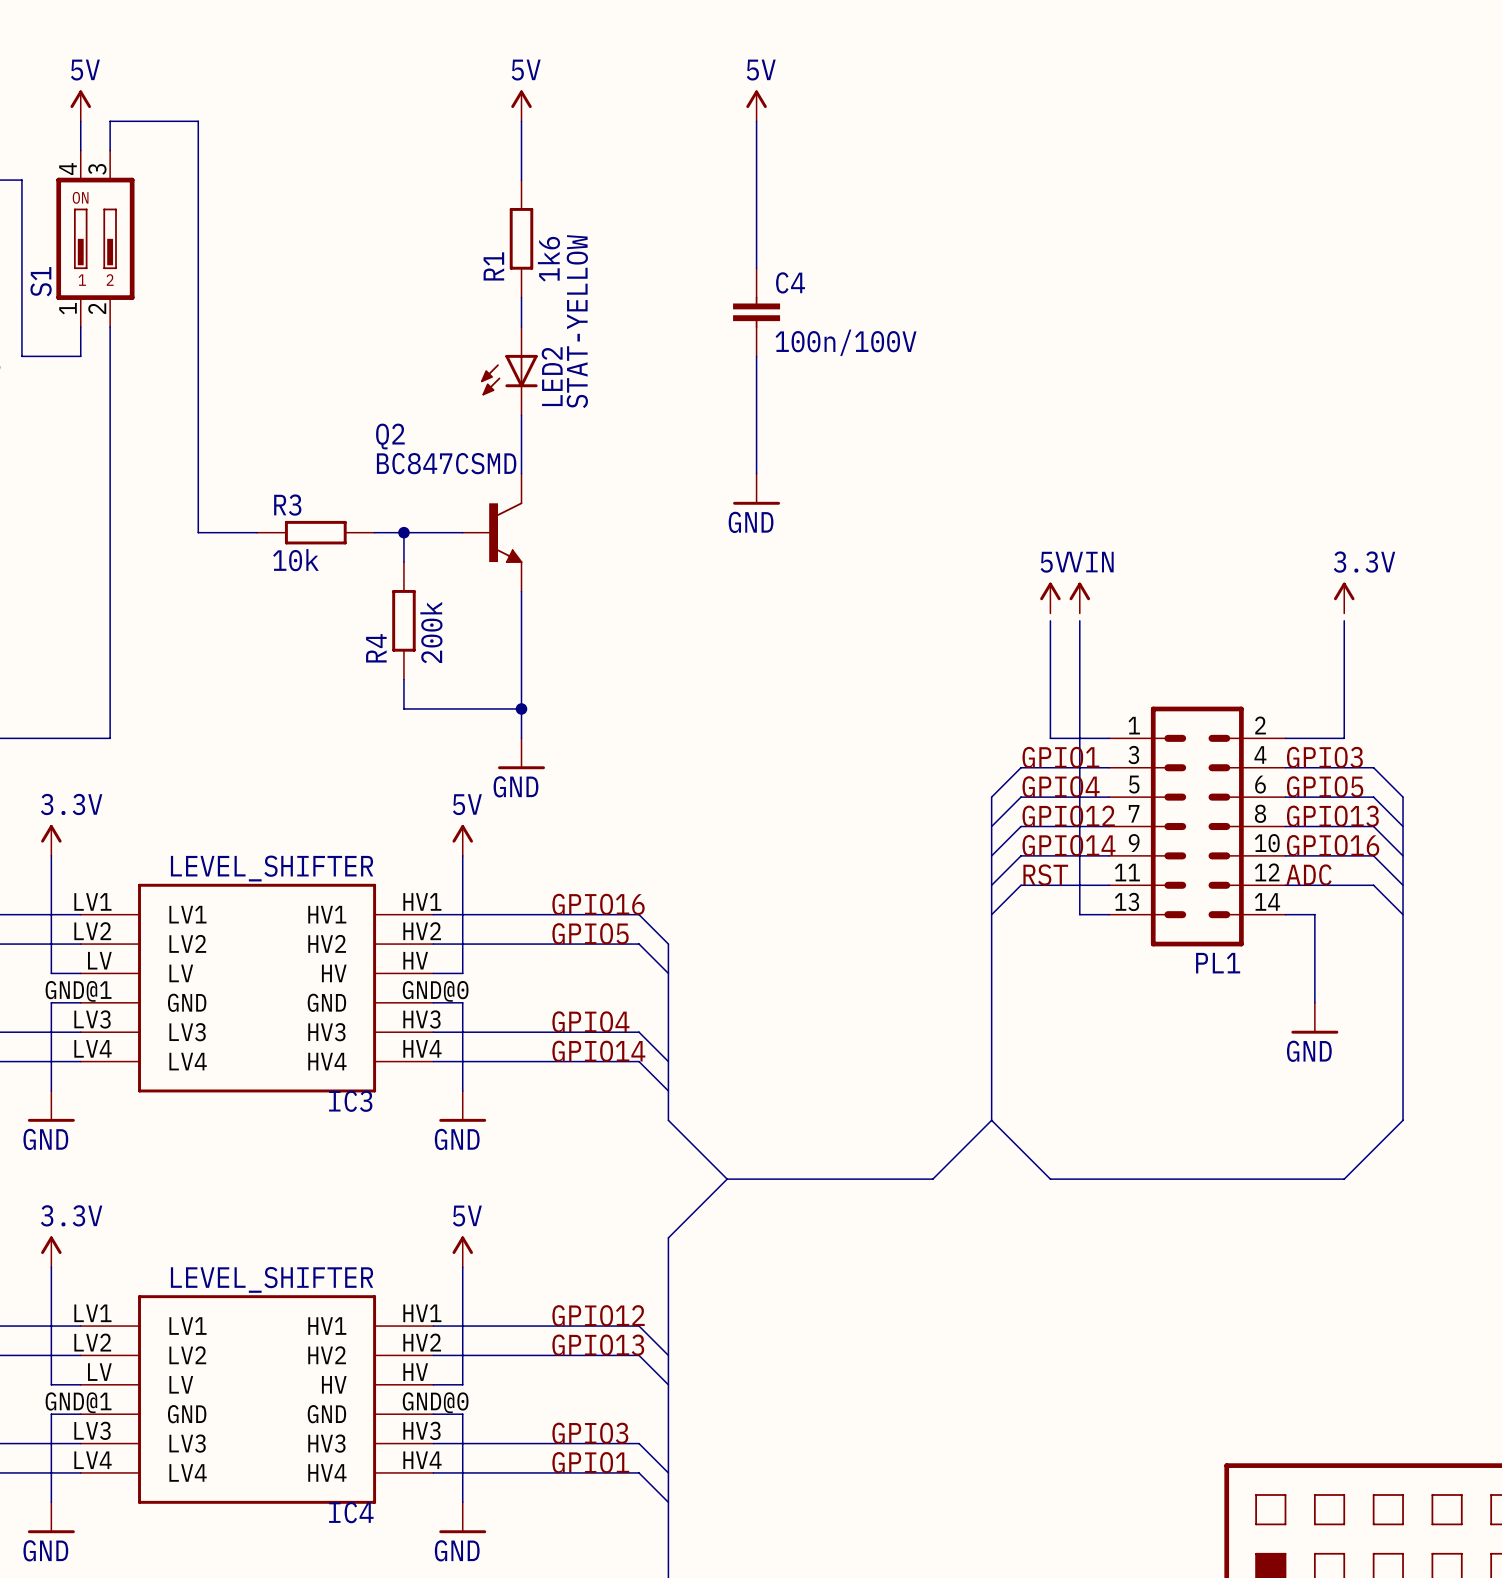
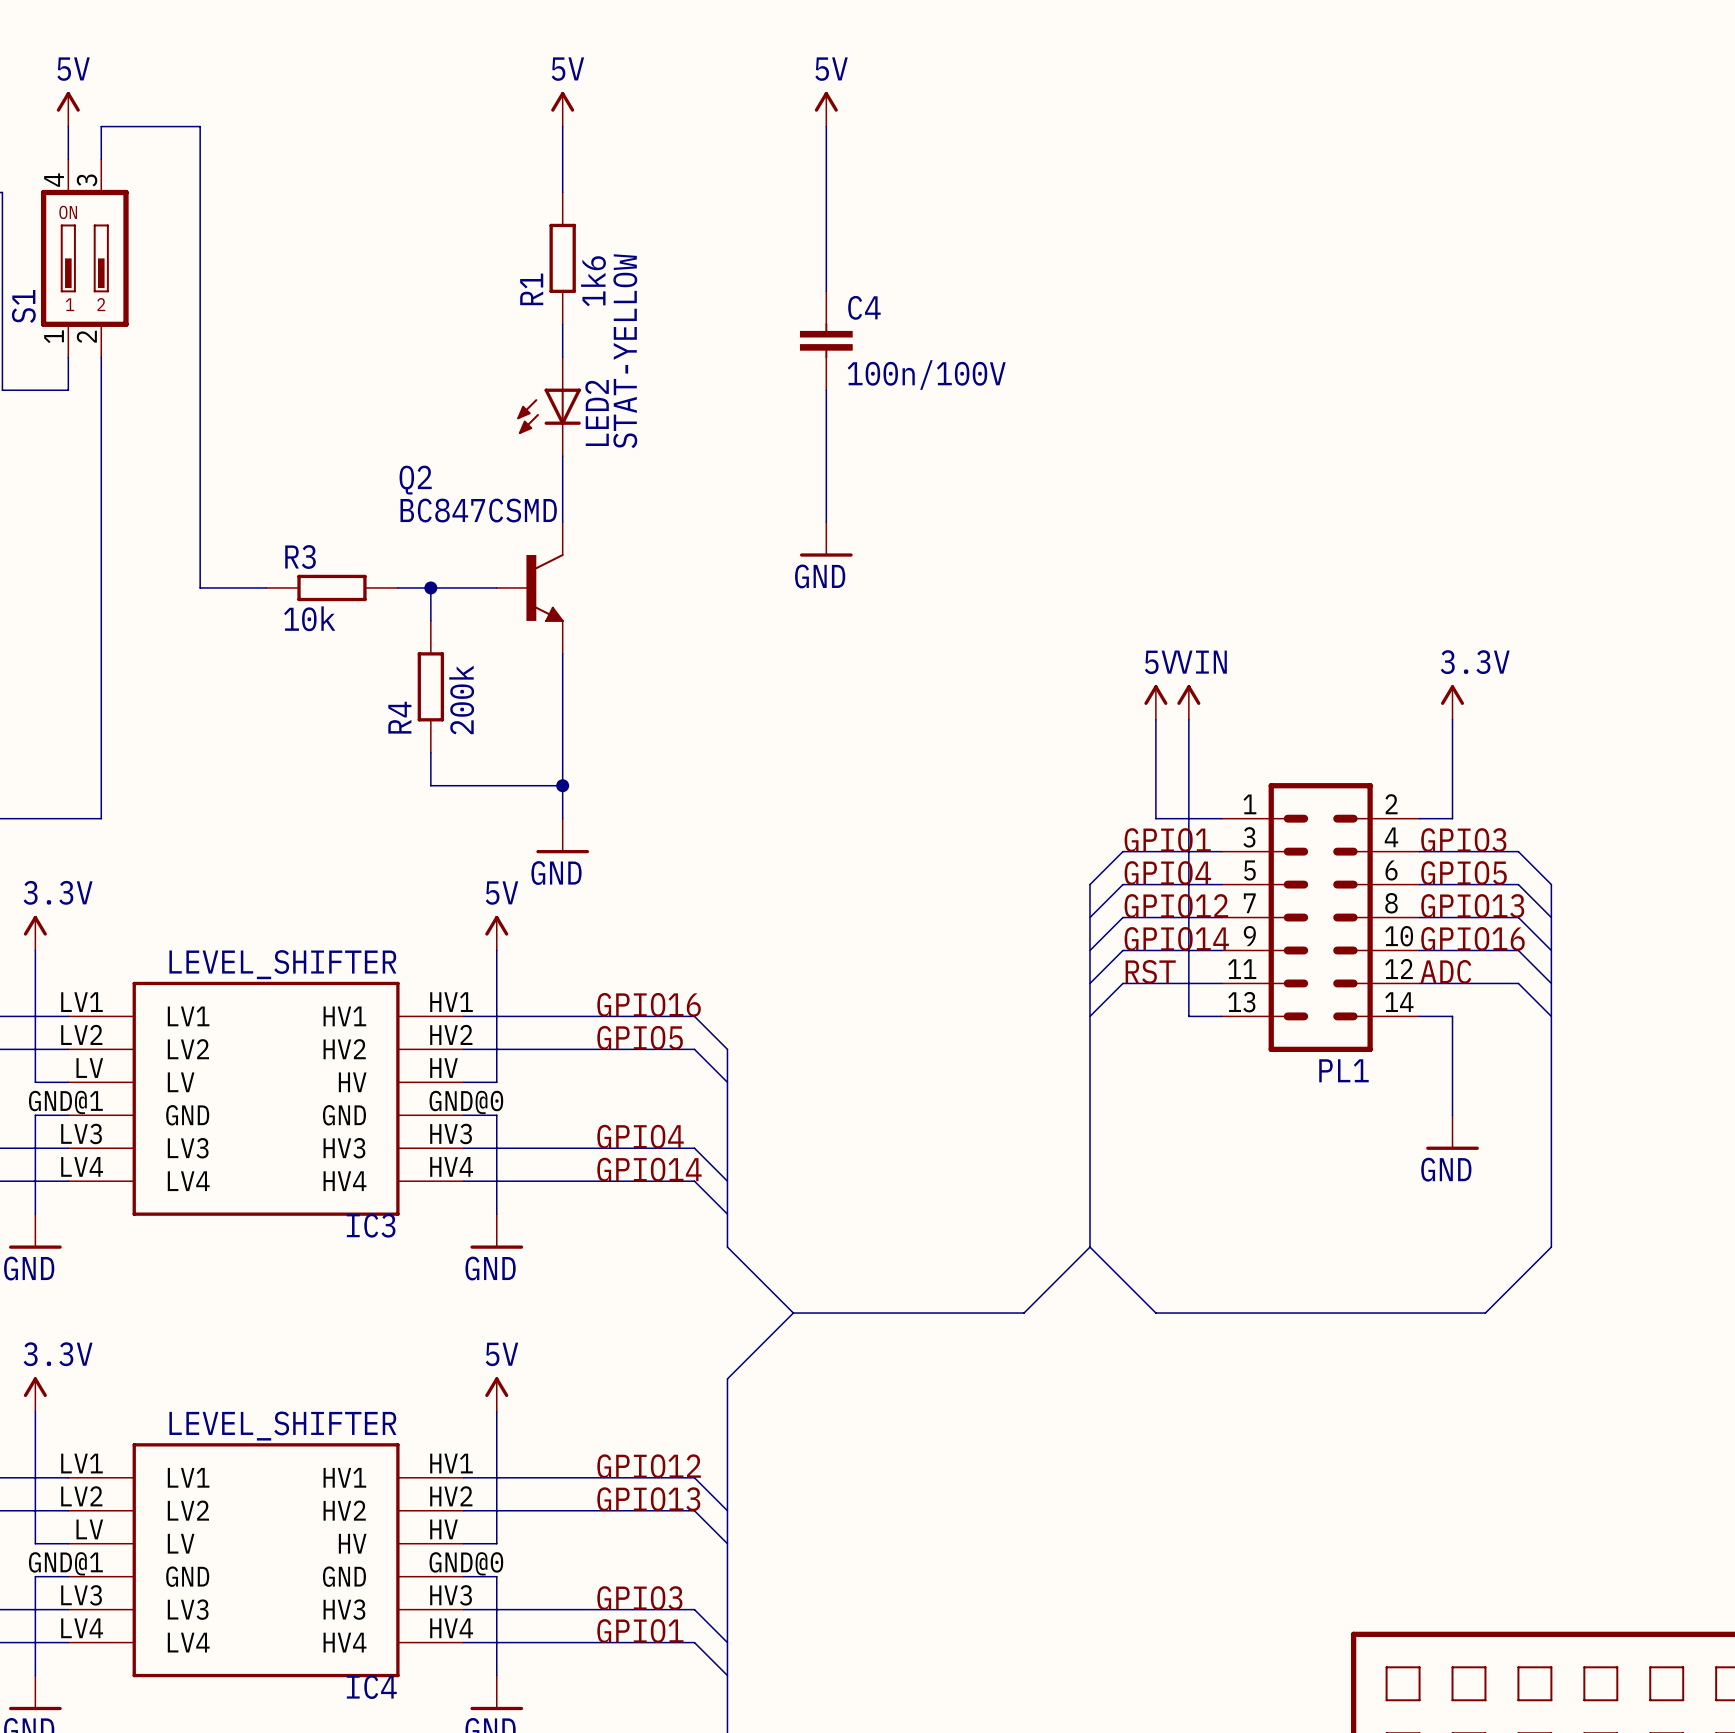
power symbol position: 5V (1050, 598) -> 5V (1155, 702)
power symbol position: VIN (1079, 598) -> VIN (1188, 702)
power symbol position: 3.3V (1344, 598) -> 3.3V (1452, 702)
wire: (1344, 620) (1344, 738) (1314, 738) -> (1452, 719) (1452, 818)

